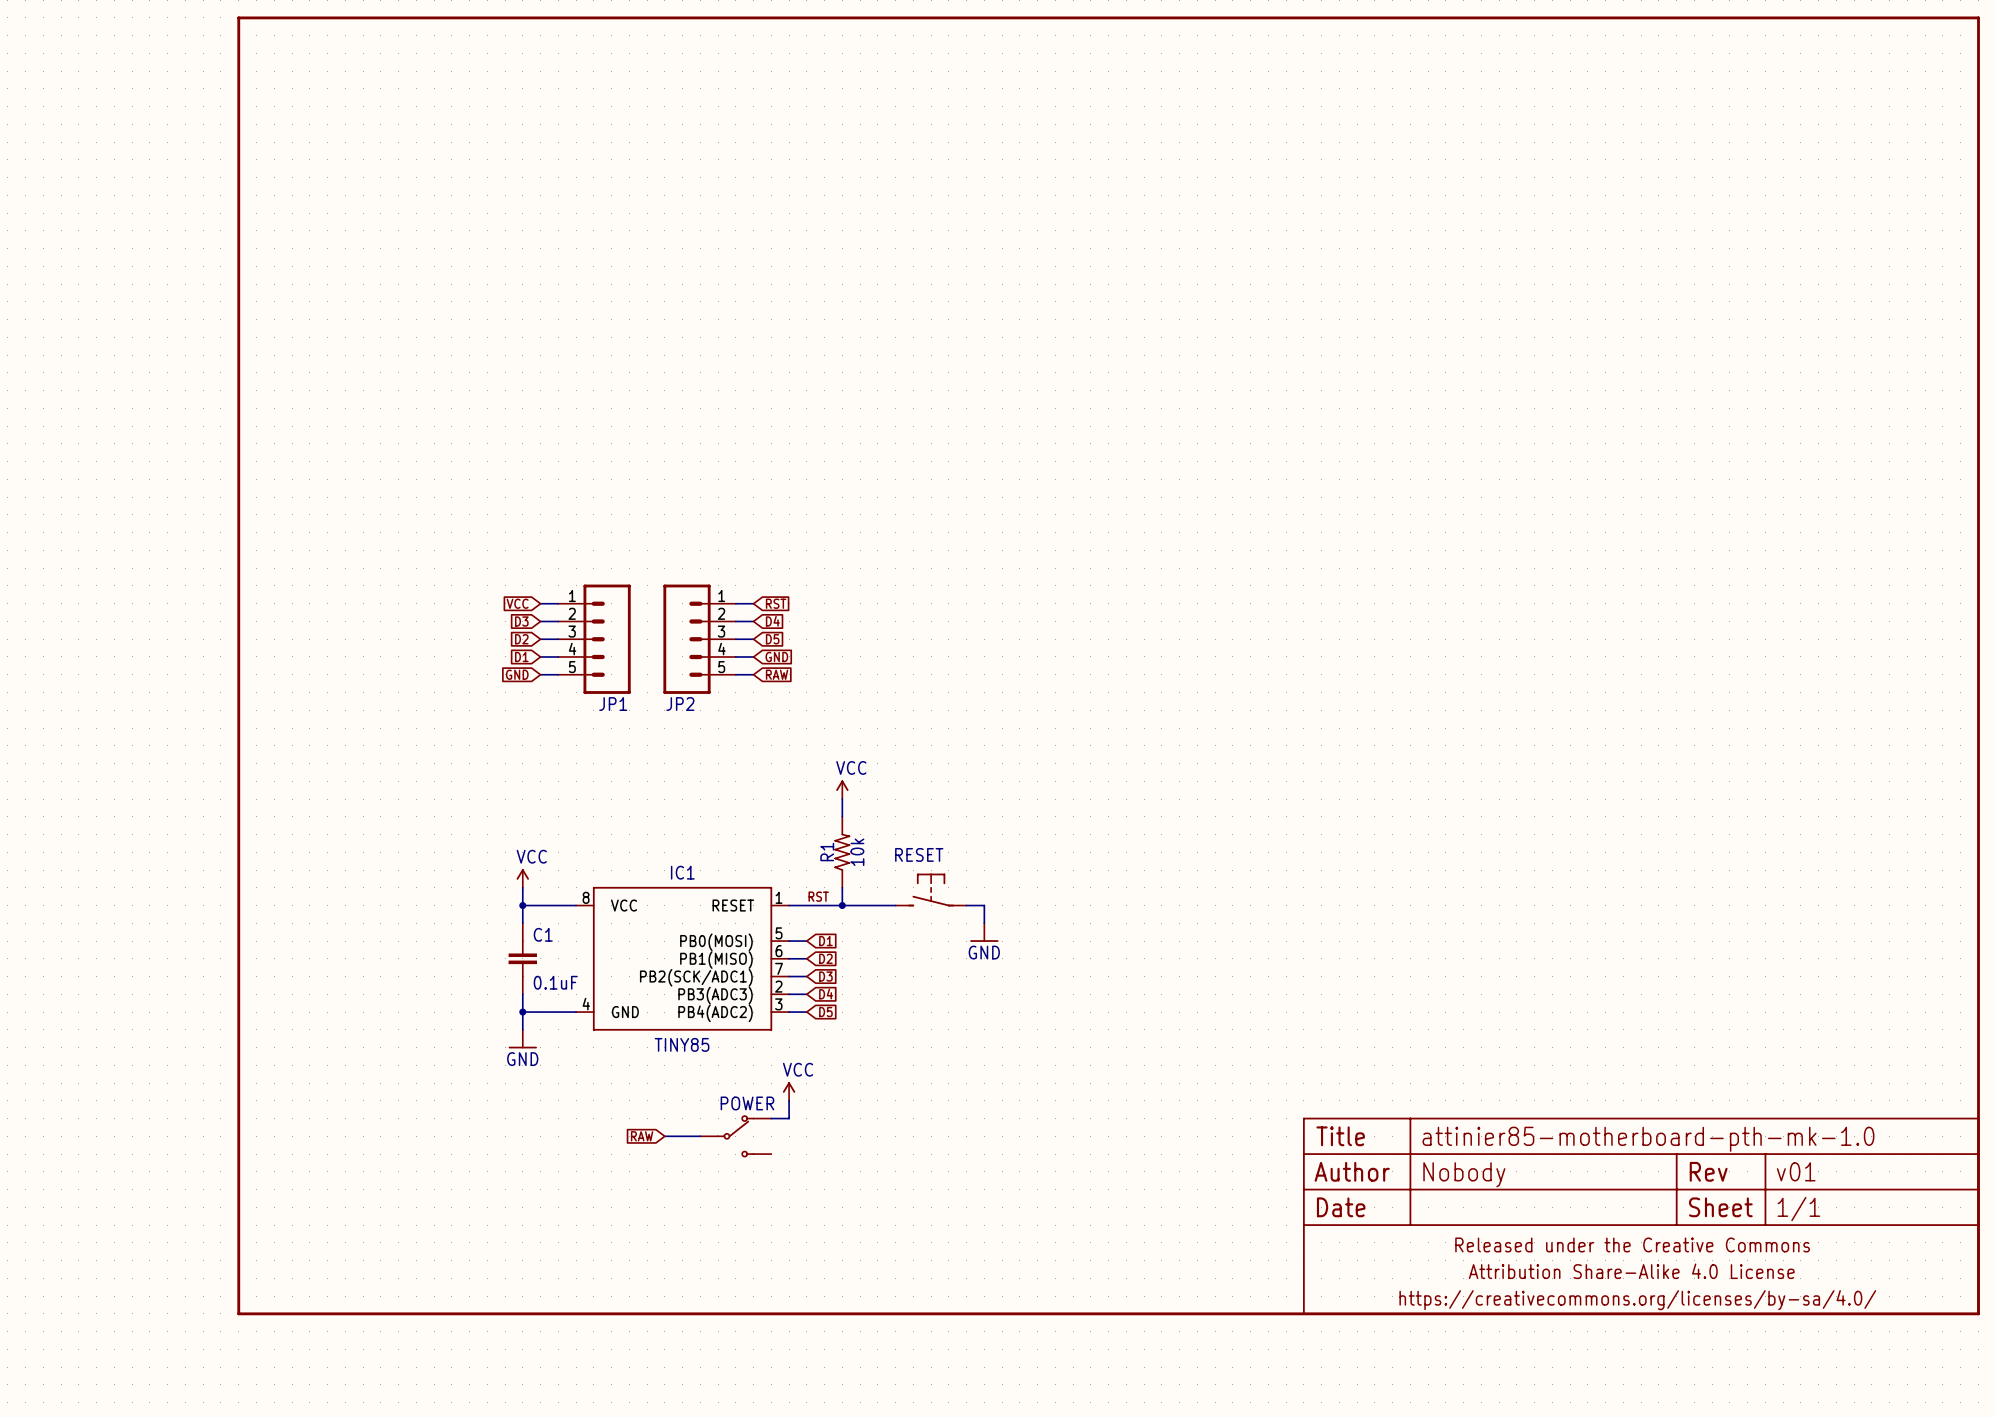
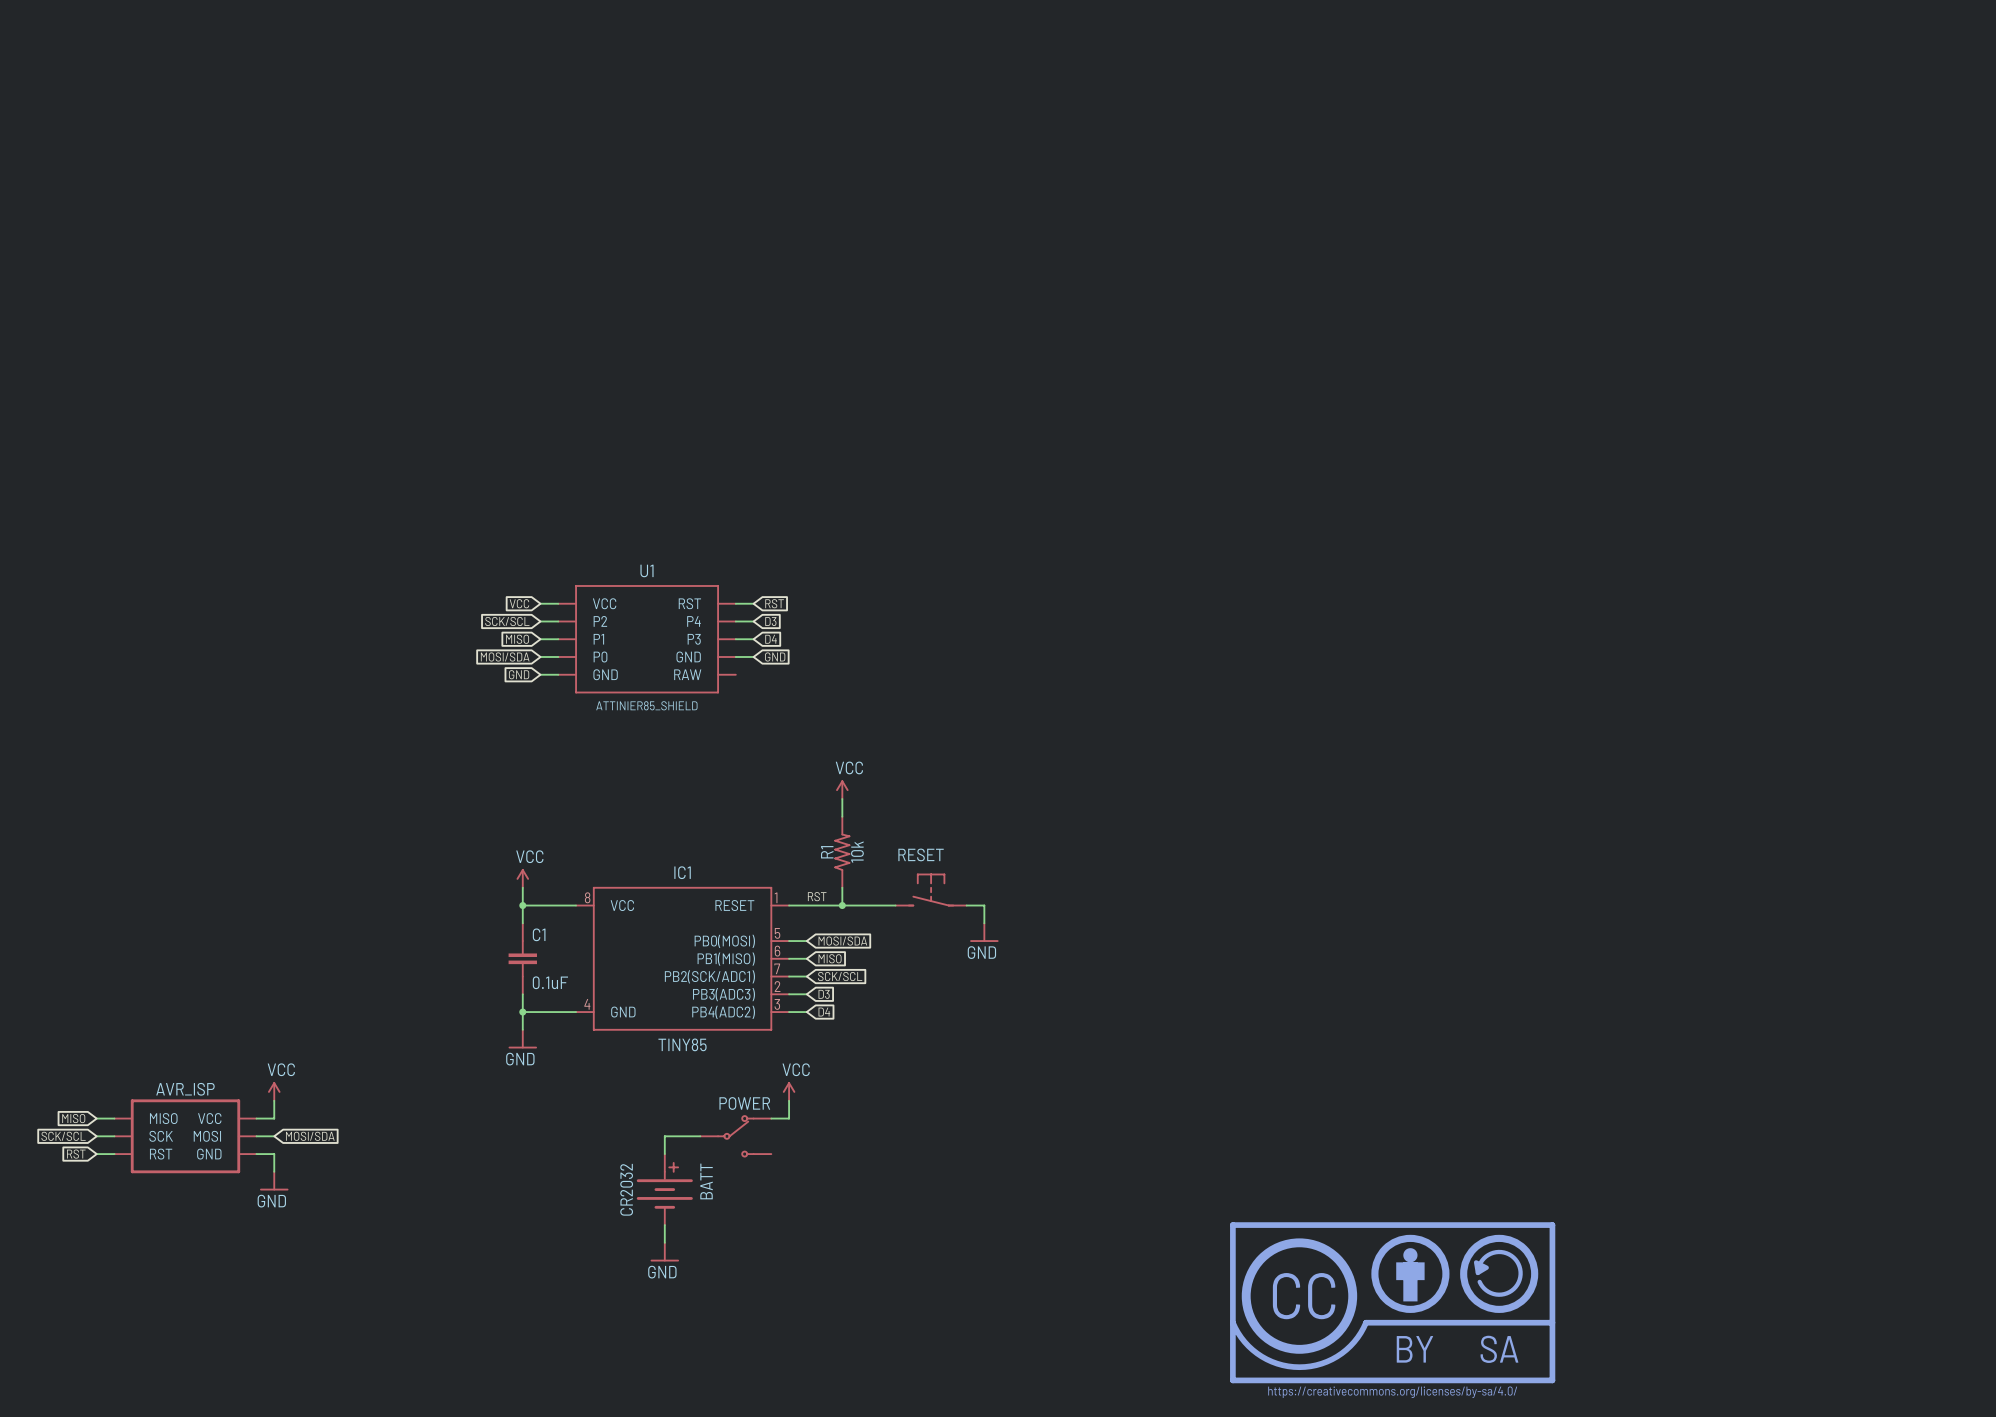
global label: D3 (521, 621) -> SCK/SCL (507, 621)
global label: D4 (772, 621) -> D3 (770, 621)
global label: D2 (521, 639) -> MISO (517, 639)
JP1: (594, 639) -> none
U1: none -> ATTINIER85_SHIELD (647, 639)
JP2: (699, 639) -> none
global label: D5 (772, 639) -> D4 (771, 639)
global label: D1 (521, 656) -> MOSI/SDA (505, 656)
part: (1108, 665) -> none
wire: (735, 674) (753, 674) -> none
global label: RAW (777, 674) -> none
global label: D1 (825, 941) -> MOSI/SDA (842, 941)
global label: D2 (825, 958) -> MISO (830, 958)
global label: D3 (825, 976) -> SCK/SCL (840, 976)
global label: D4 (826, 994) -> D3 (824, 994)
global label: D5 (825, 1012) -> D4 (824, 1012)
power symbol: none -> VCC (274, 1091)
wire: none -> (274, 1100) (274, 1118) (256, 1118)
global label: none -> MISO (73, 1118)
wire: none -> (96, 1118) (114, 1118)
wire: none -> (96, 1136) (114, 1136)
AVR_ISP: none -> (185, 1136)
wire: none -> (256, 1136) (274, 1136)
global label: RAW (642, 1136) -> none
wire: none -> (664, 1136) (664, 1154)
global label: none -> SCK/SCL (63, 1136)
global label: none -> MOSI/SDA (310, 1136)
global label: none -> RST (76, 1154)
wire: none -> (96, 1154) (114, 1154)
wire: none -> (256, 1154) (274, 1154) (274, 1171)
power symbol: none -> GND (274, 1181)
BATT: none -> CR2032 (664, 1189)
part: (1641, 1216) -> none
wire: none -> (664, 1225) (664, 1242)
power symbol: none -> GND (664, 1252)
part: none -> (1392, 1302)

